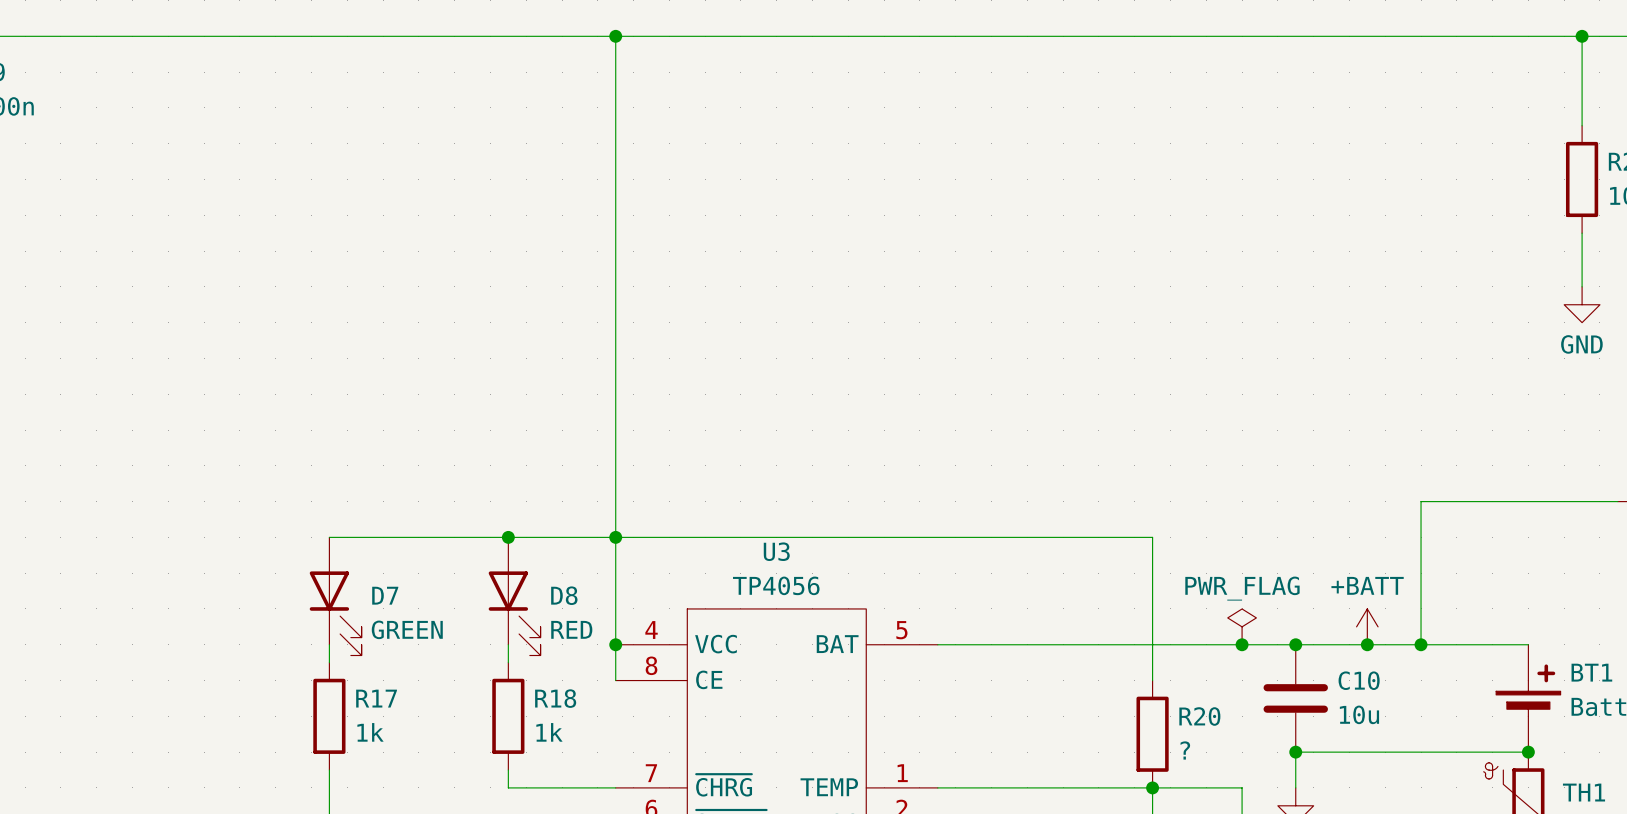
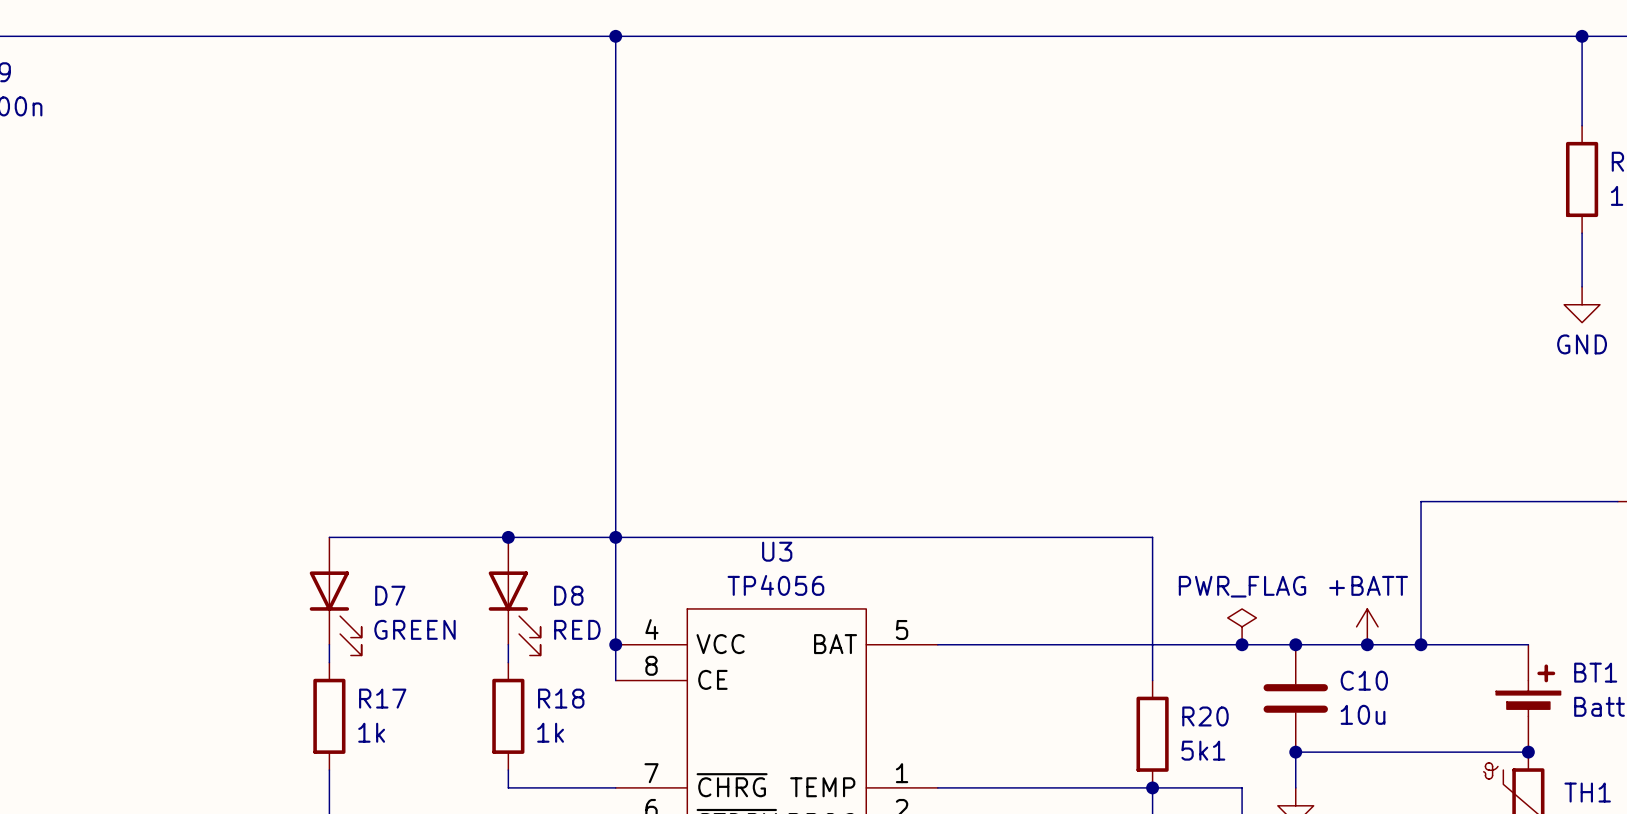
R20 value: ? (1185, 750) -> 5k1 (1203, 750)

